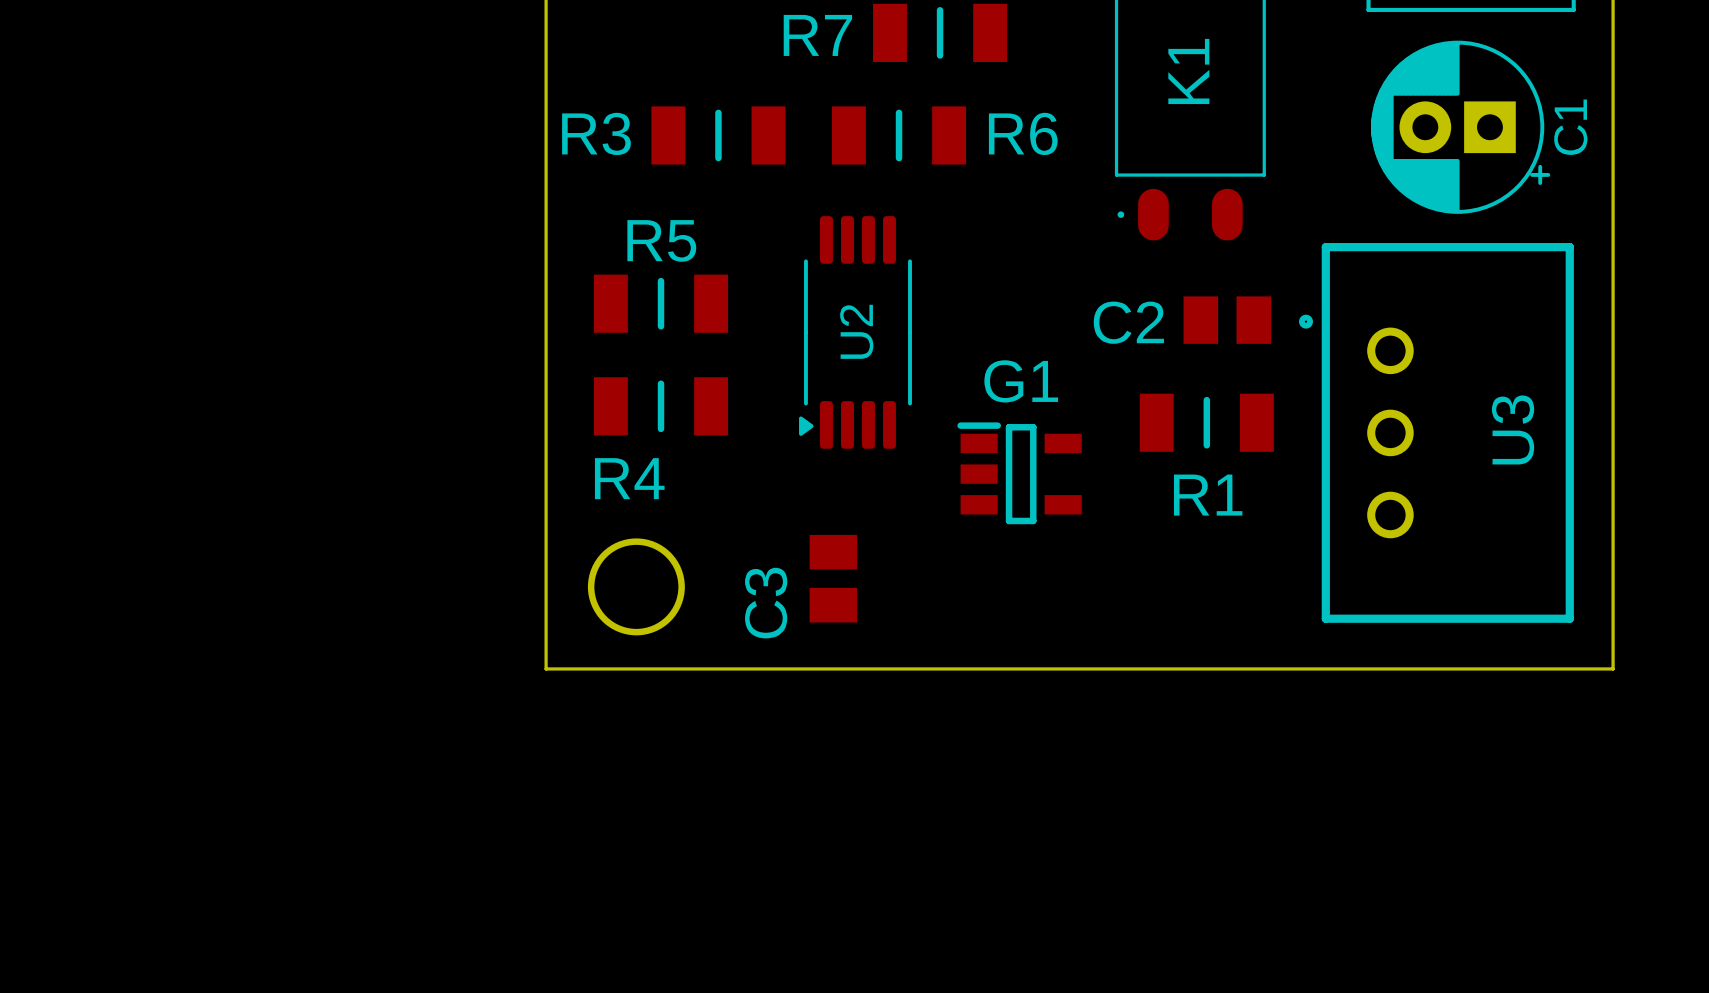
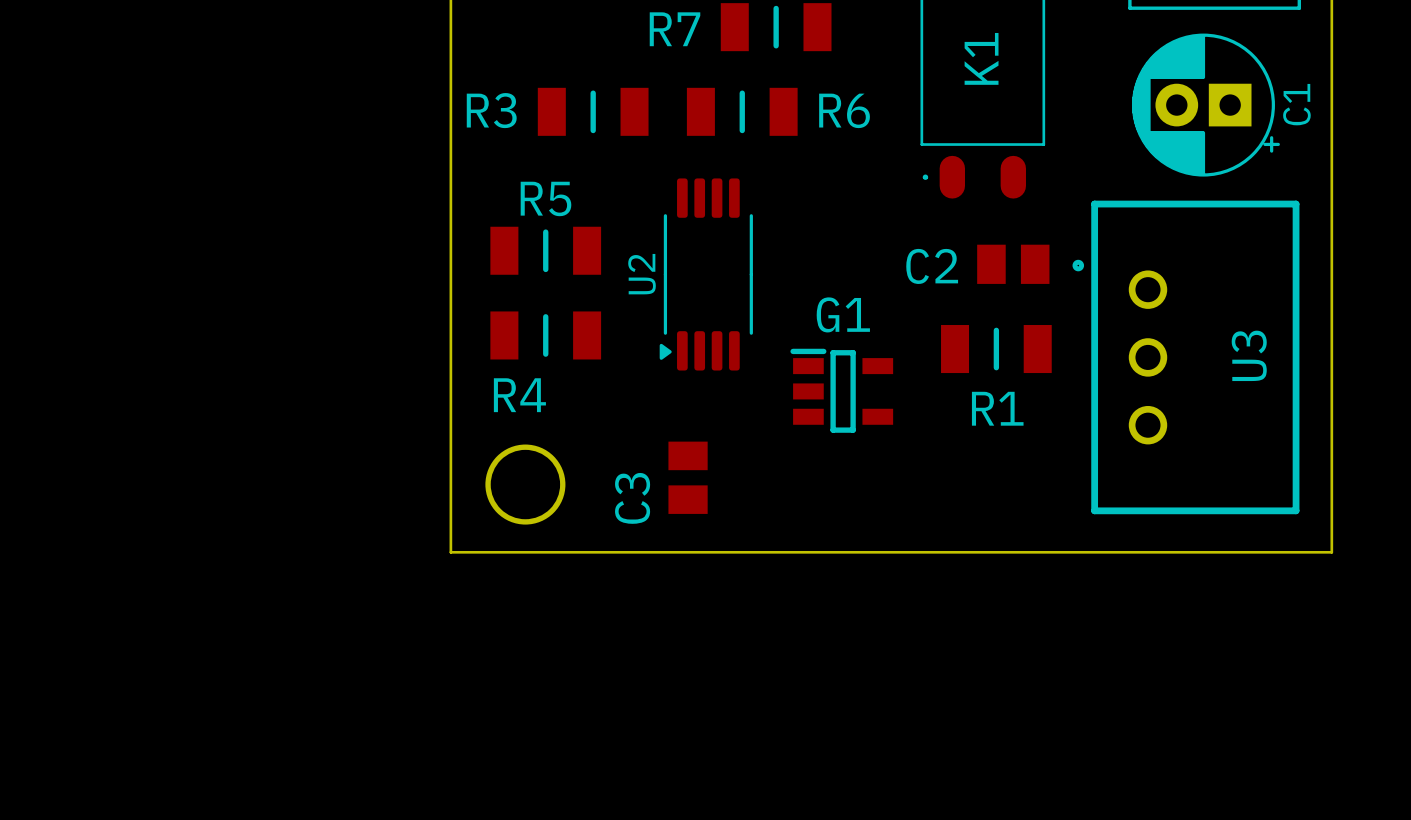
U2 name position: U2 (856, 331) -> U2 (642, 274)

